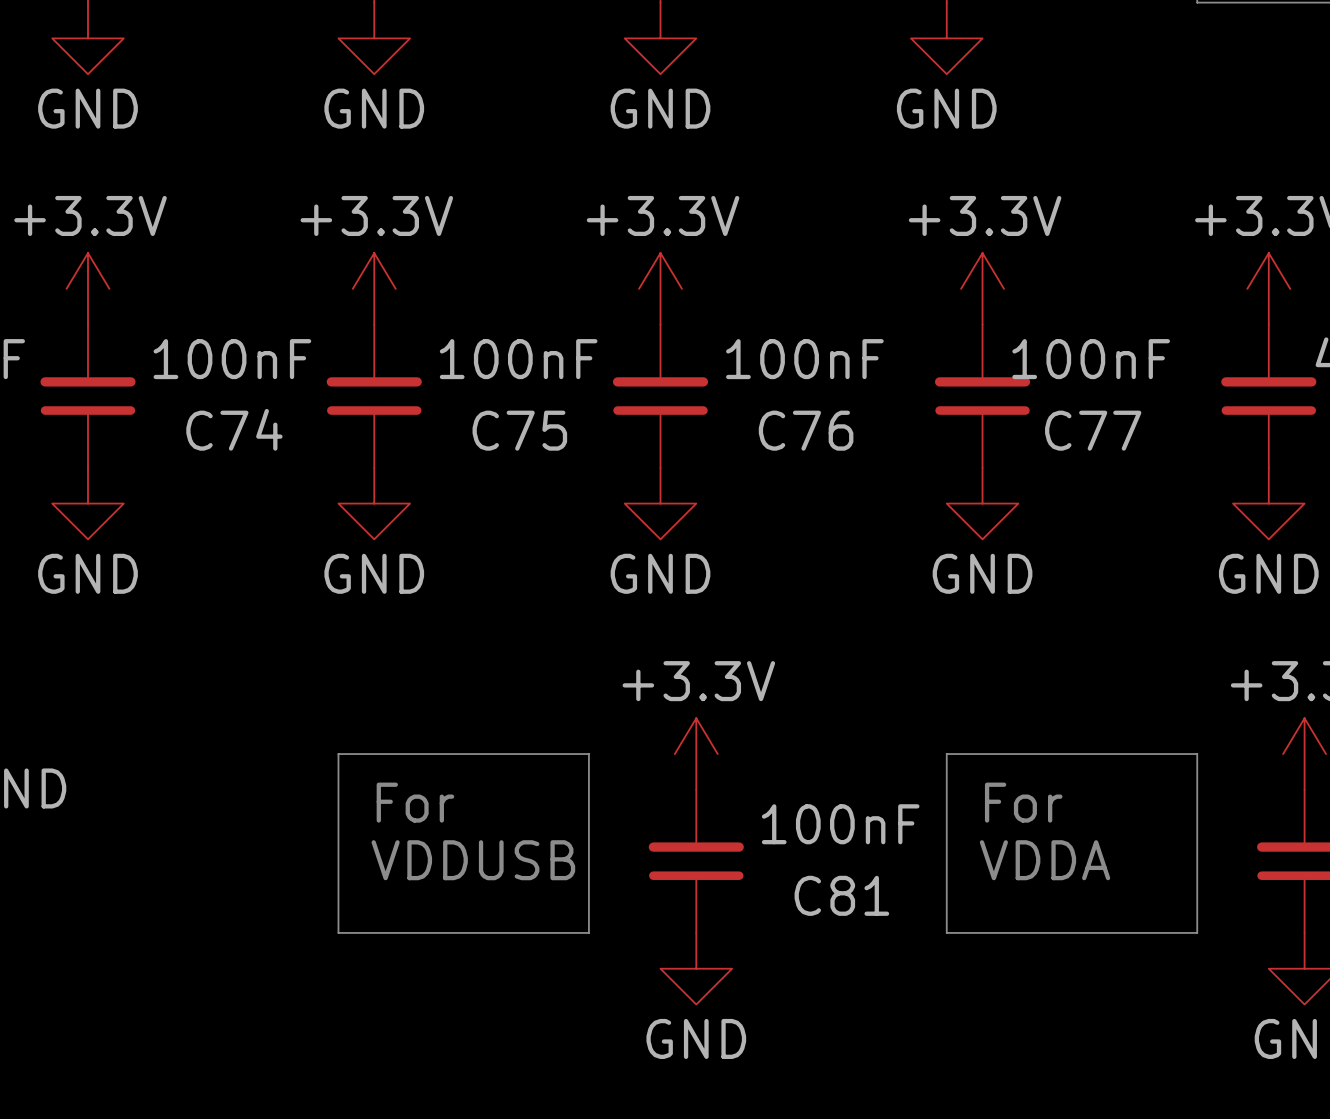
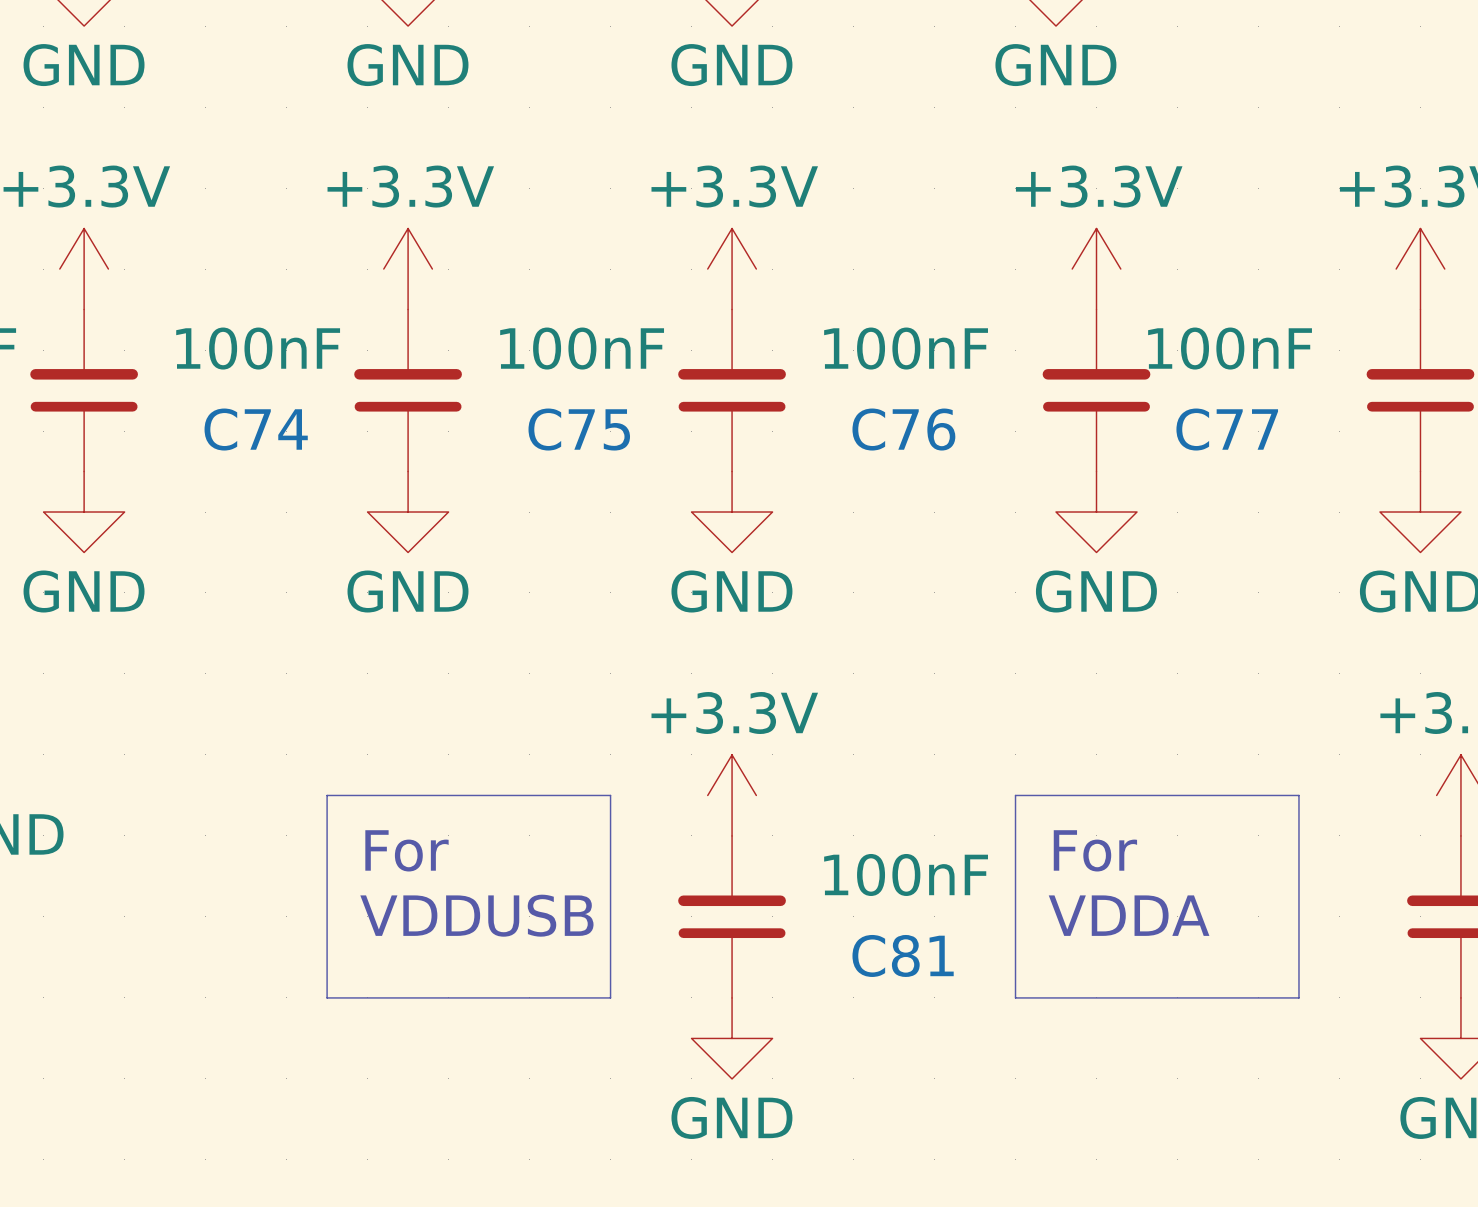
line: (338, 754) (338, 932) -> (367, 795) (327, 795) (327, 997) (367, 997)
line: (553, 754) (588, 754) (588, 932) (553, 932) -> (610, 795) (610, 997)
power symbol position: +3.3V (696, 754) -> +3.3V (732, 795)
line: (946, 754) (946, 932) -> (1056, 795) (1015, 795) (1015, 997) (1056, 997)
line: (1161, 754) (1197, 754) (1197, 932) (1161, 932) -> (1298, 795) (1298, 997)
text position: For (415, 802) -> For (406, 850)
text position: For (1023, 802) -> For (1095, 850)
text position: VDDUSB (473, 860) -> VDDUSB (476, 915)
text position: VDDA (1045, 860) -> VDDA (1129, 915)
C81 position: (696, 861) -> (732, 916)
power symbol position: GND (696, 968) -> GND (732, 1038)

